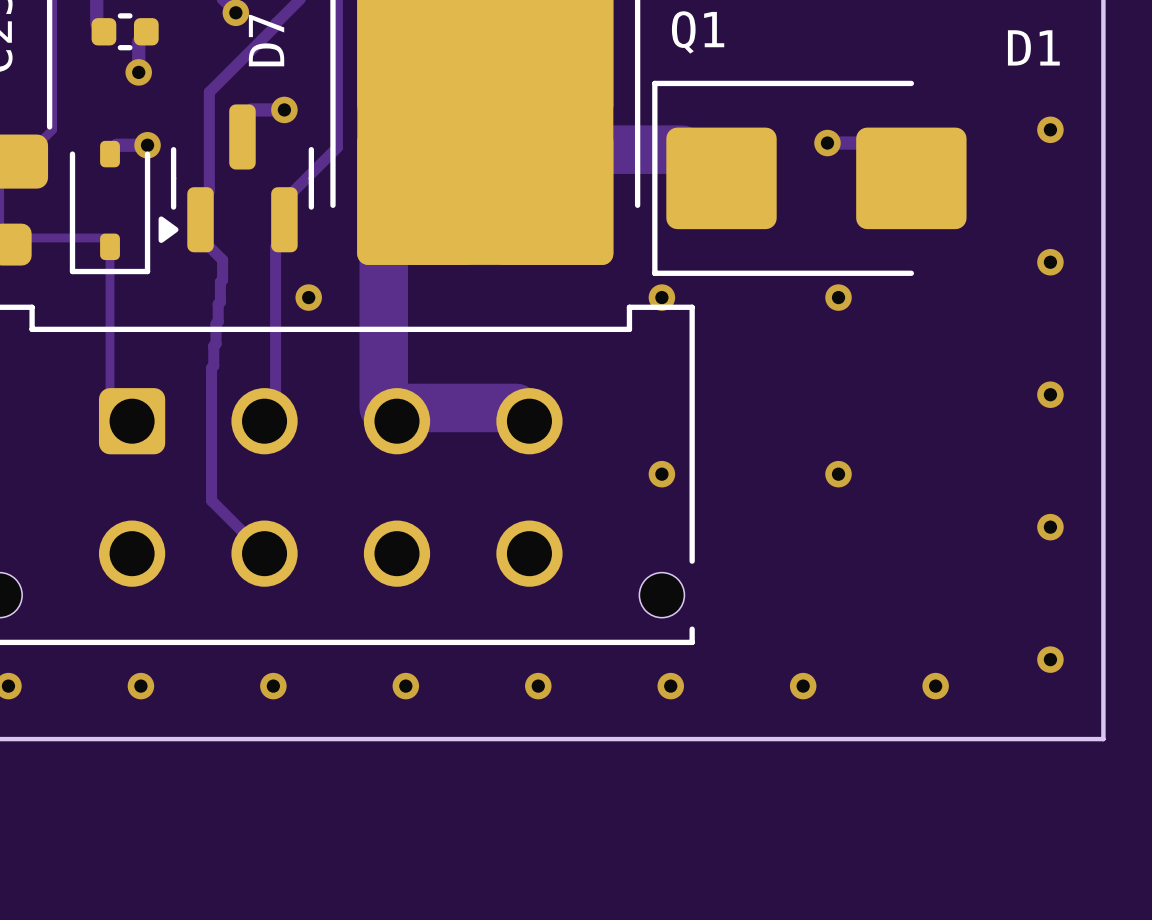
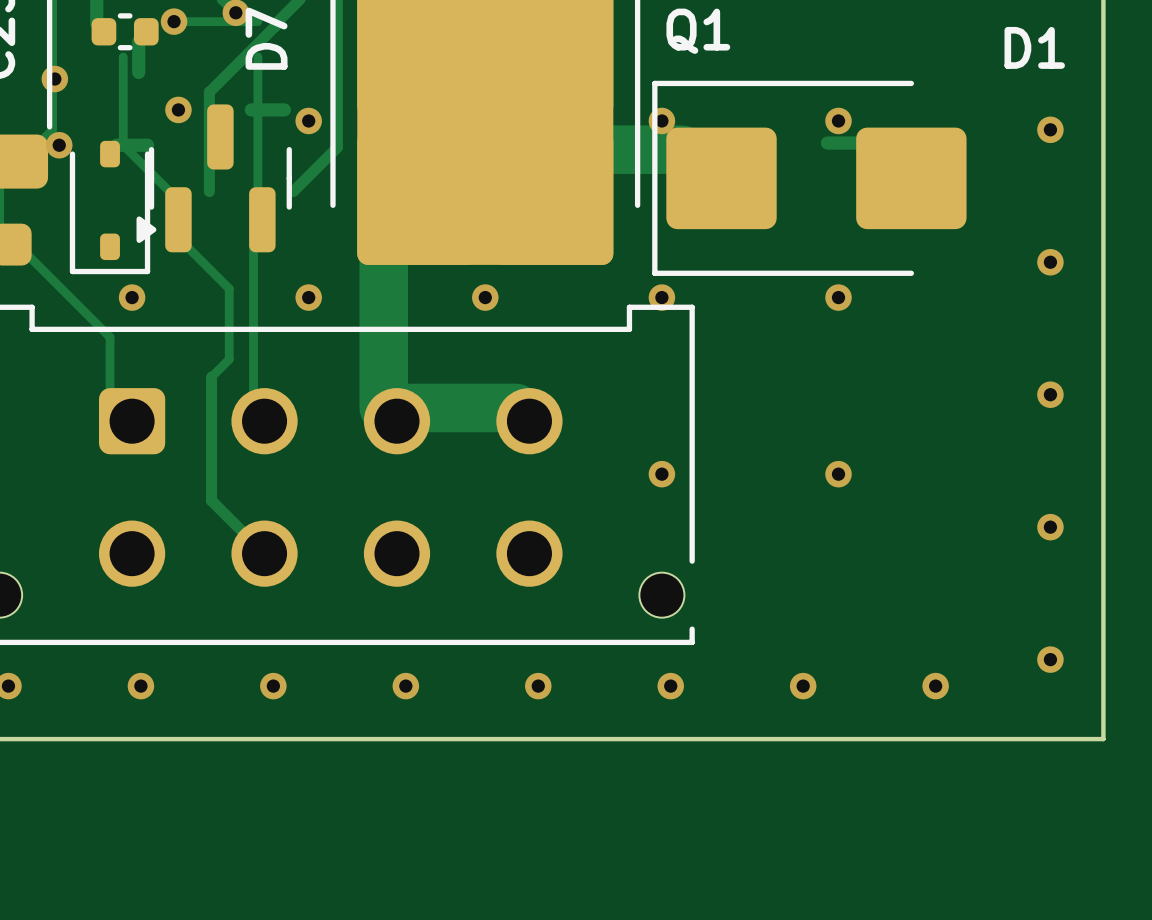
track: none -> (174, 21) (257, 21)
via: none -> (174, 21)
track: none -> (123, 56) (123, 145) (169, 191)
track: none -> (257, 56) (257, 191)
via: (138, 72) -> none
via: none -> (54, 79)
via: none -> (178, 109)
via position: (284, 109) -> (308, 120)
via: none -> (661, 120)
via position: (827, 143) -> (838, 120)
via: none -> (59, 145)
via: (147, 145) -> none
part position: (236, 178) -> (214, 178)
track: (23, 237) (103, 237) -> none
track: (209, 246) (222, 260) (222, 279) (220, 282) (220, 301) (218, 304) (218, 321) (215, 324) (215, 343) (213, 346) (211, 377) -> (187, 246) (229, 288) (229, 359) (211, 377)
track: (275, 246) (275, 407) -> (253, 246) (253, 407)
track: (110, 255) (110, 337) -> (28, 255) (110, 337)
via: none -> (132, 297)
via: none -> (485, 297)

